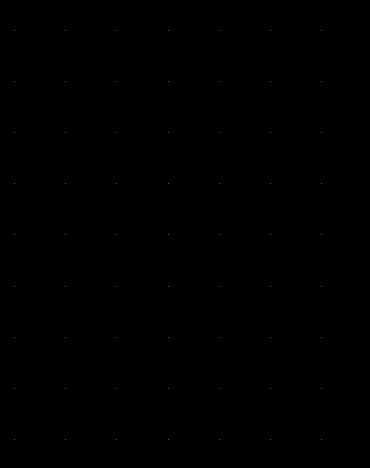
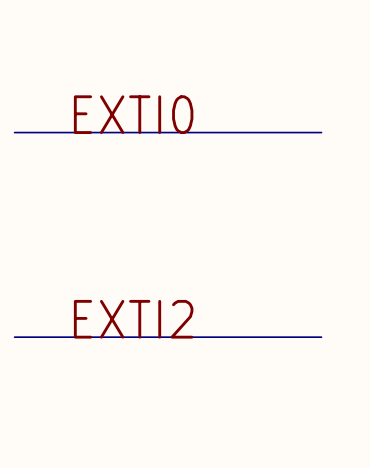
label: none -> EXTI0 (133, 114)
wire: none -> (14, 132) (321, 132)
label: none -> EXTI2 (133, 319)
wire: none -> (14, 337) (321, 337)

